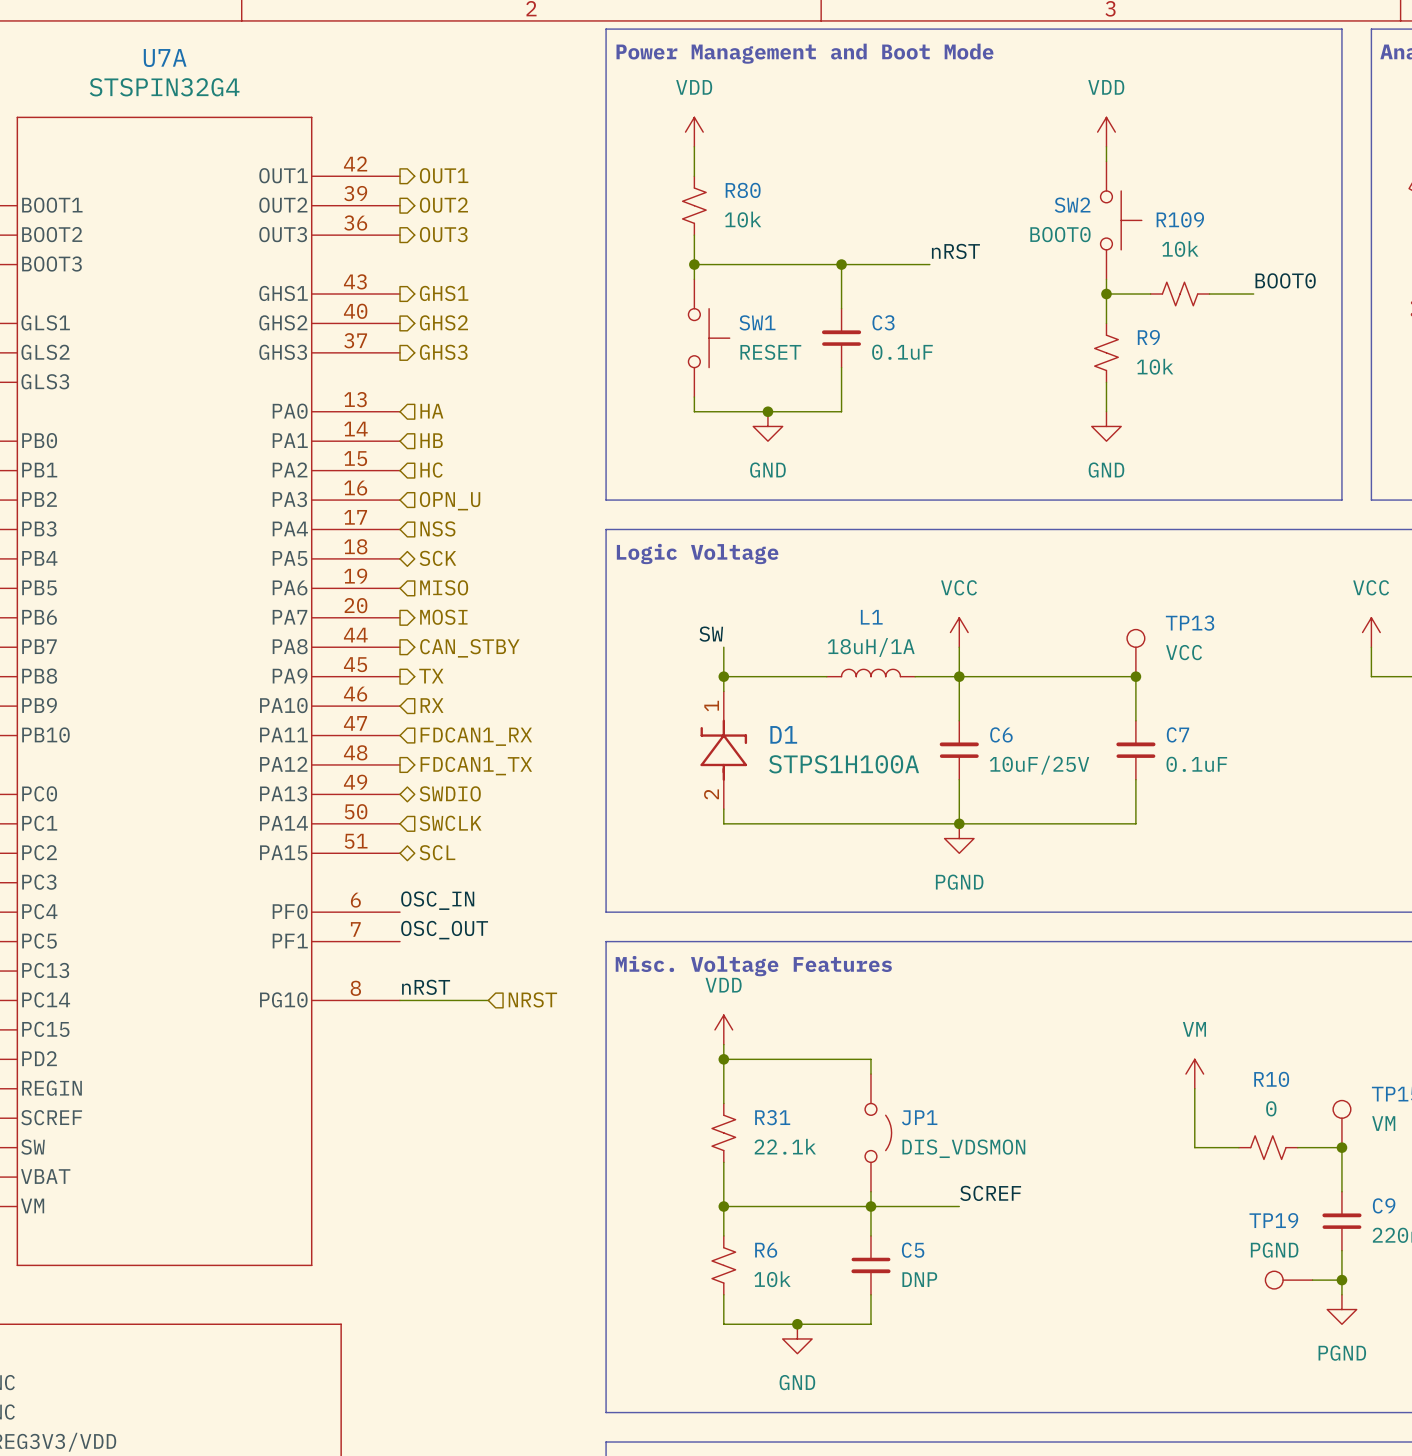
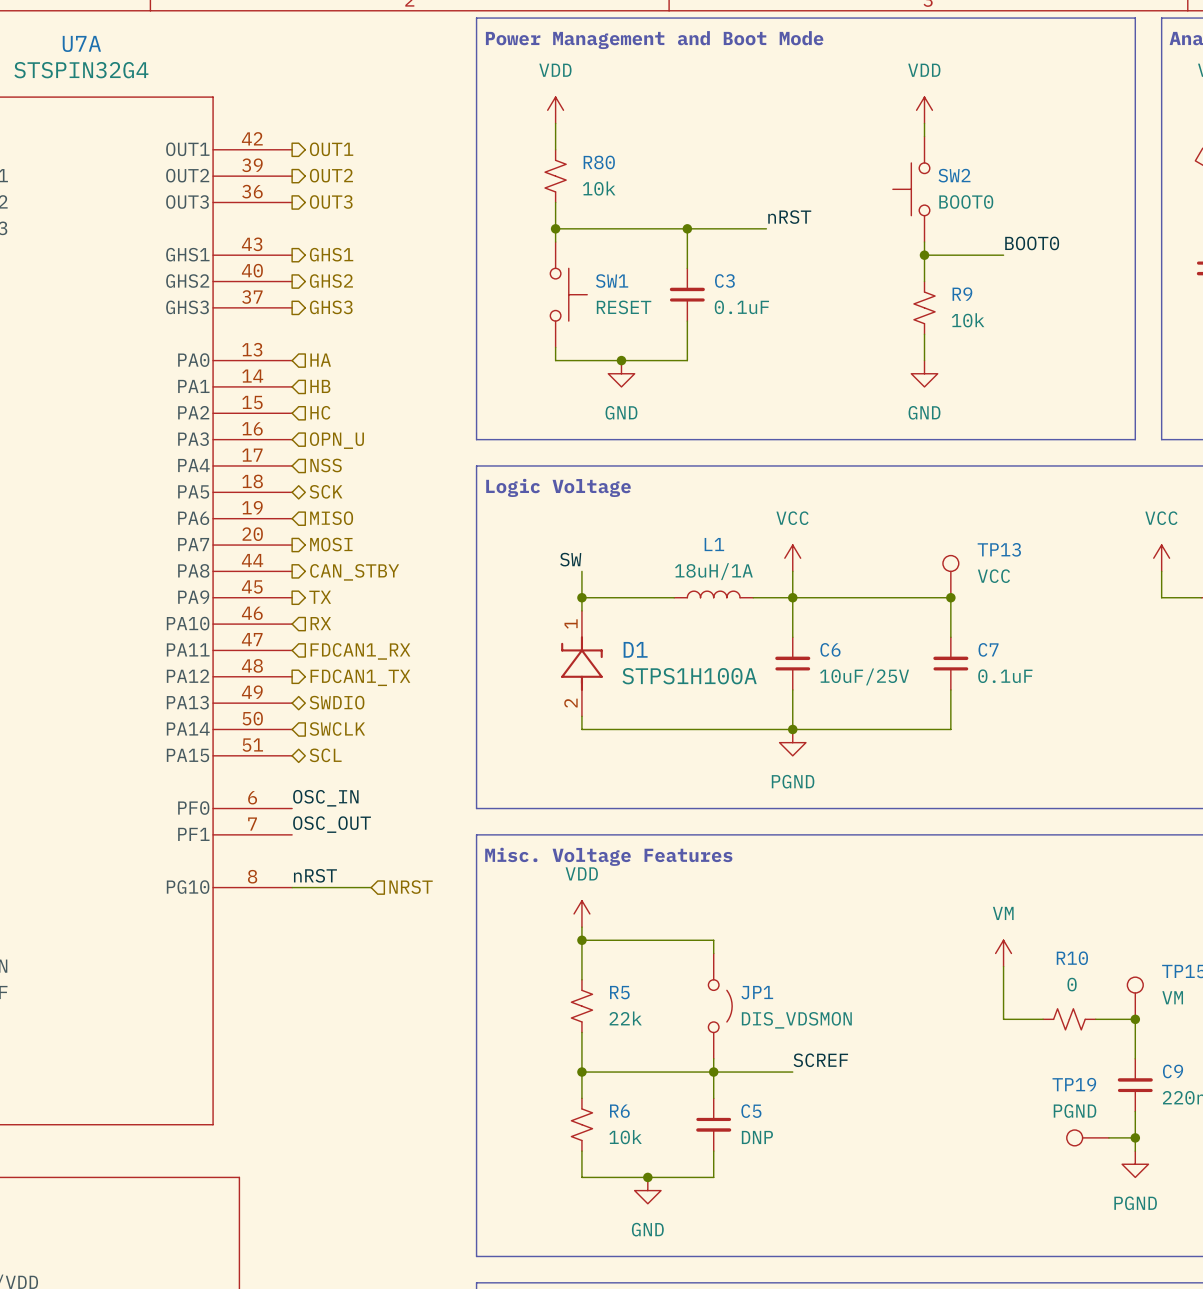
SW2 name position: SW2 (1072, 205) -> SW2 (954, 175)
SW2 rotation: 0° (1121, 220) -> 180° (911, 189)
SW2 value position: BOOT0 (1060, 234) -> BOOT0 (966, 201)
label position: BOOT0 (1285, 280) -> BOOT0 (1032, 243)
R109: 10k (1180, 294) -> none
wire: (1209, 294) (1253, 294) -> (964, 255) (1003, 255)
R31 name: R31 (772, 1117) -> R5 (619, 992)
R31 value: 22.1k (785, 1146) -> 22k (625, 1018)

